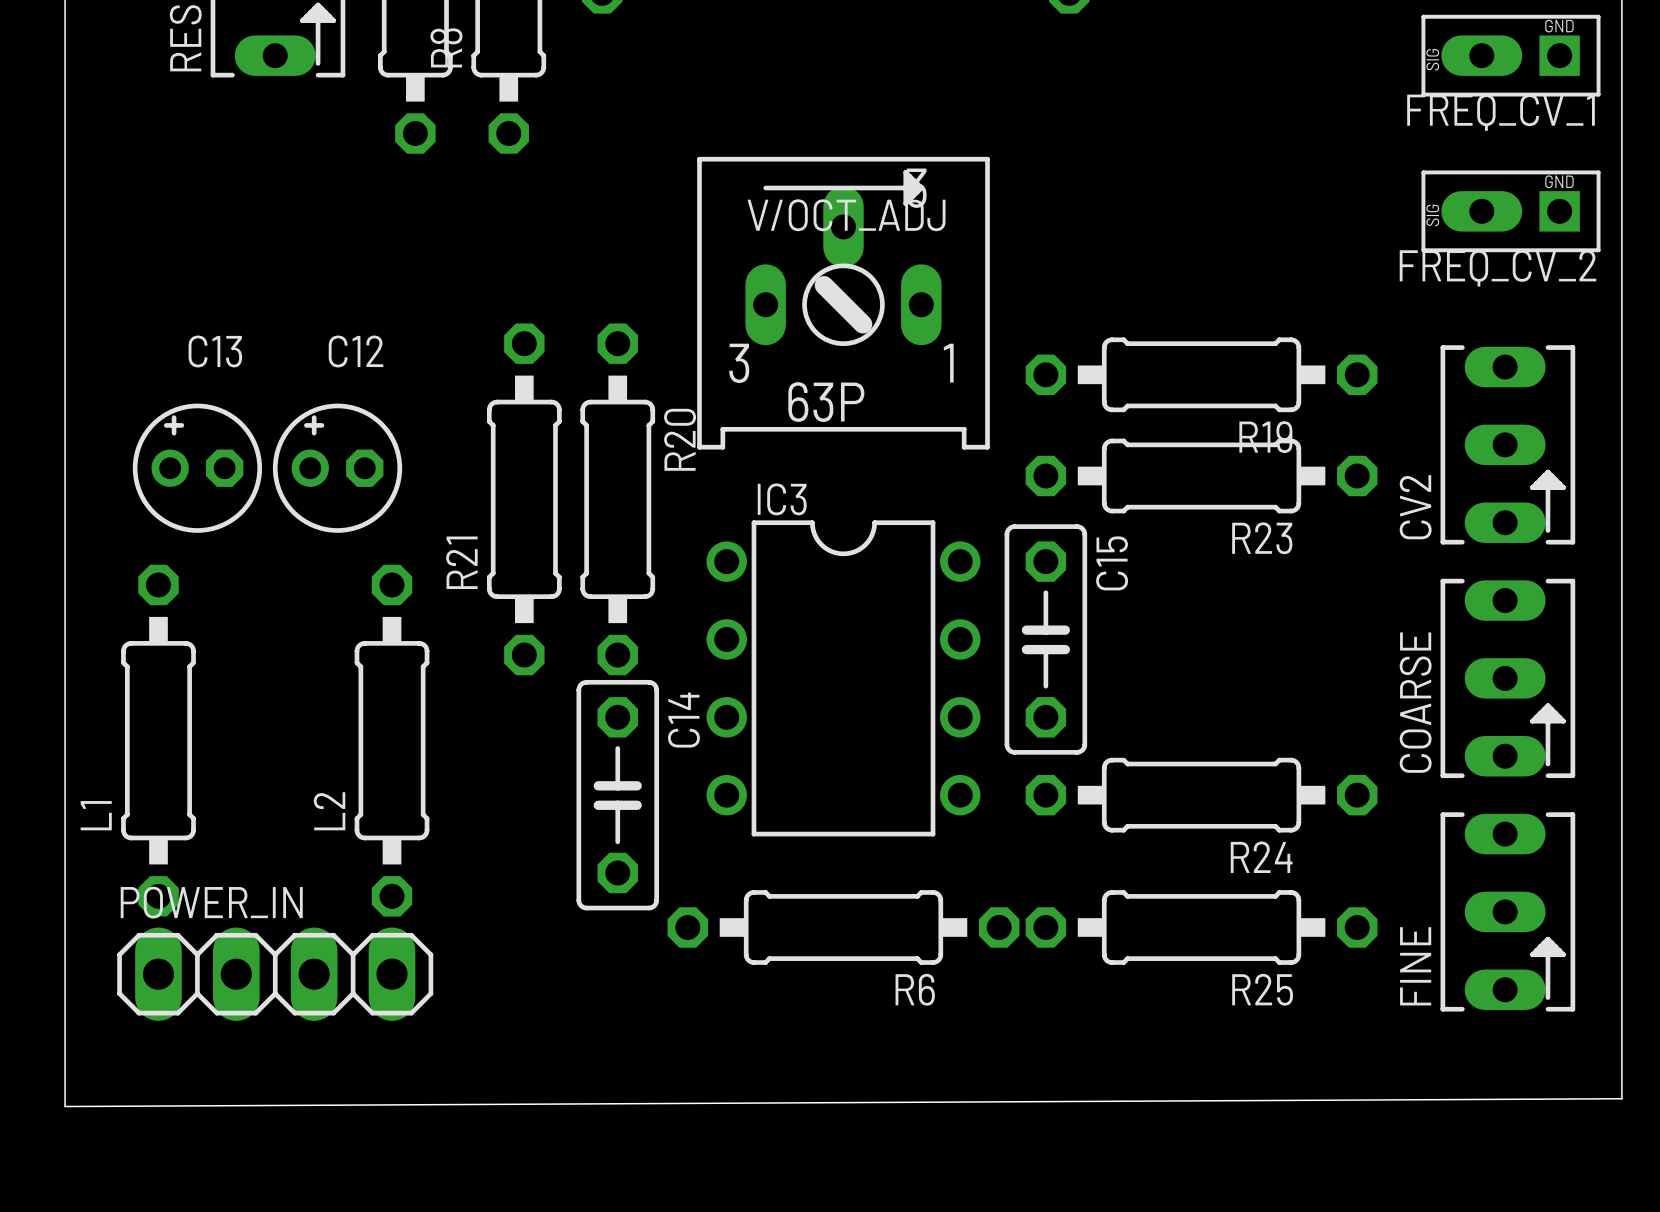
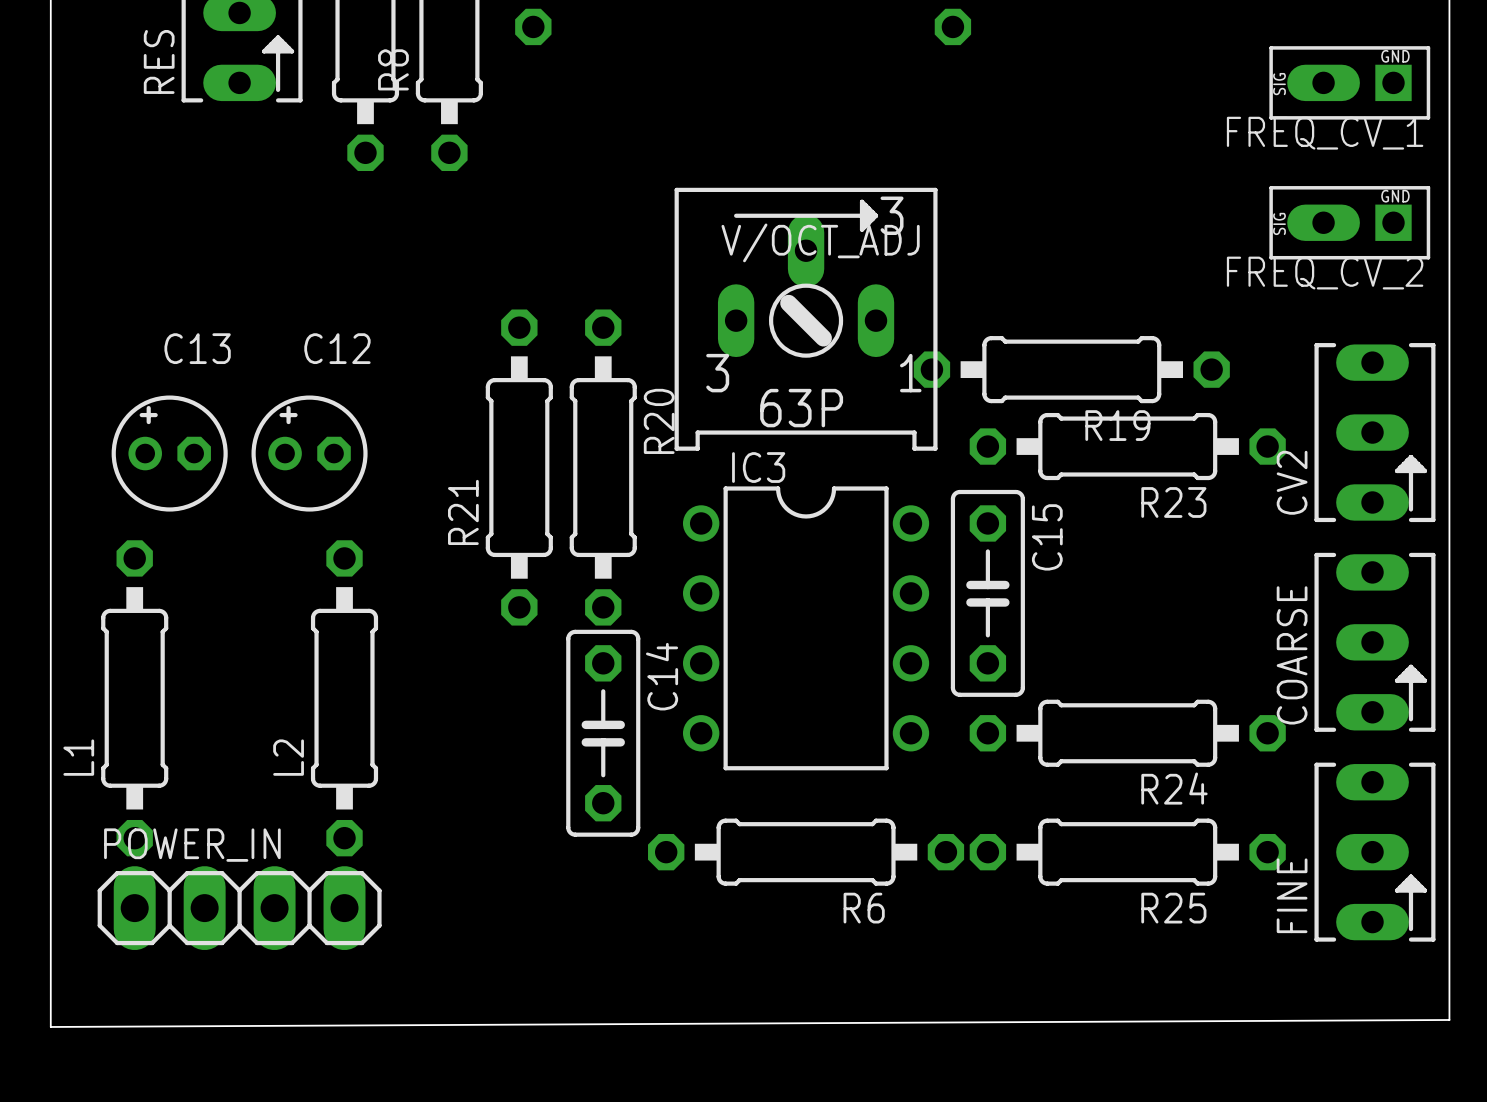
V/OCT_ADJ position: (843, 303) -> (806, 319)
CV2 position: (1507, 444) -> (1374, 432)
C12 position: (337, 468) -> (309, 453)
R23 position: (1201, 476) -> (1127, 446)
R21 position: (524, 499) -> (519, 467)
R20 position: (617, 499) -> (603, 467)
C15 position: (1045, 639) -> (987, 593)
IC3 position: (843, 678) -> (806, 628)
COARSE position: (1507, 678) -> (1374, 642)
C14 position: (617, 795) -> (603, 733)
R24 position: (1201, 795) -> (1127, 733)
FINE position: (1507, 911) -> (1374, 852)
R6 position: (843, 927) -> (806, 852)
R25 position: (1201, 927) -> (1127, 852)

